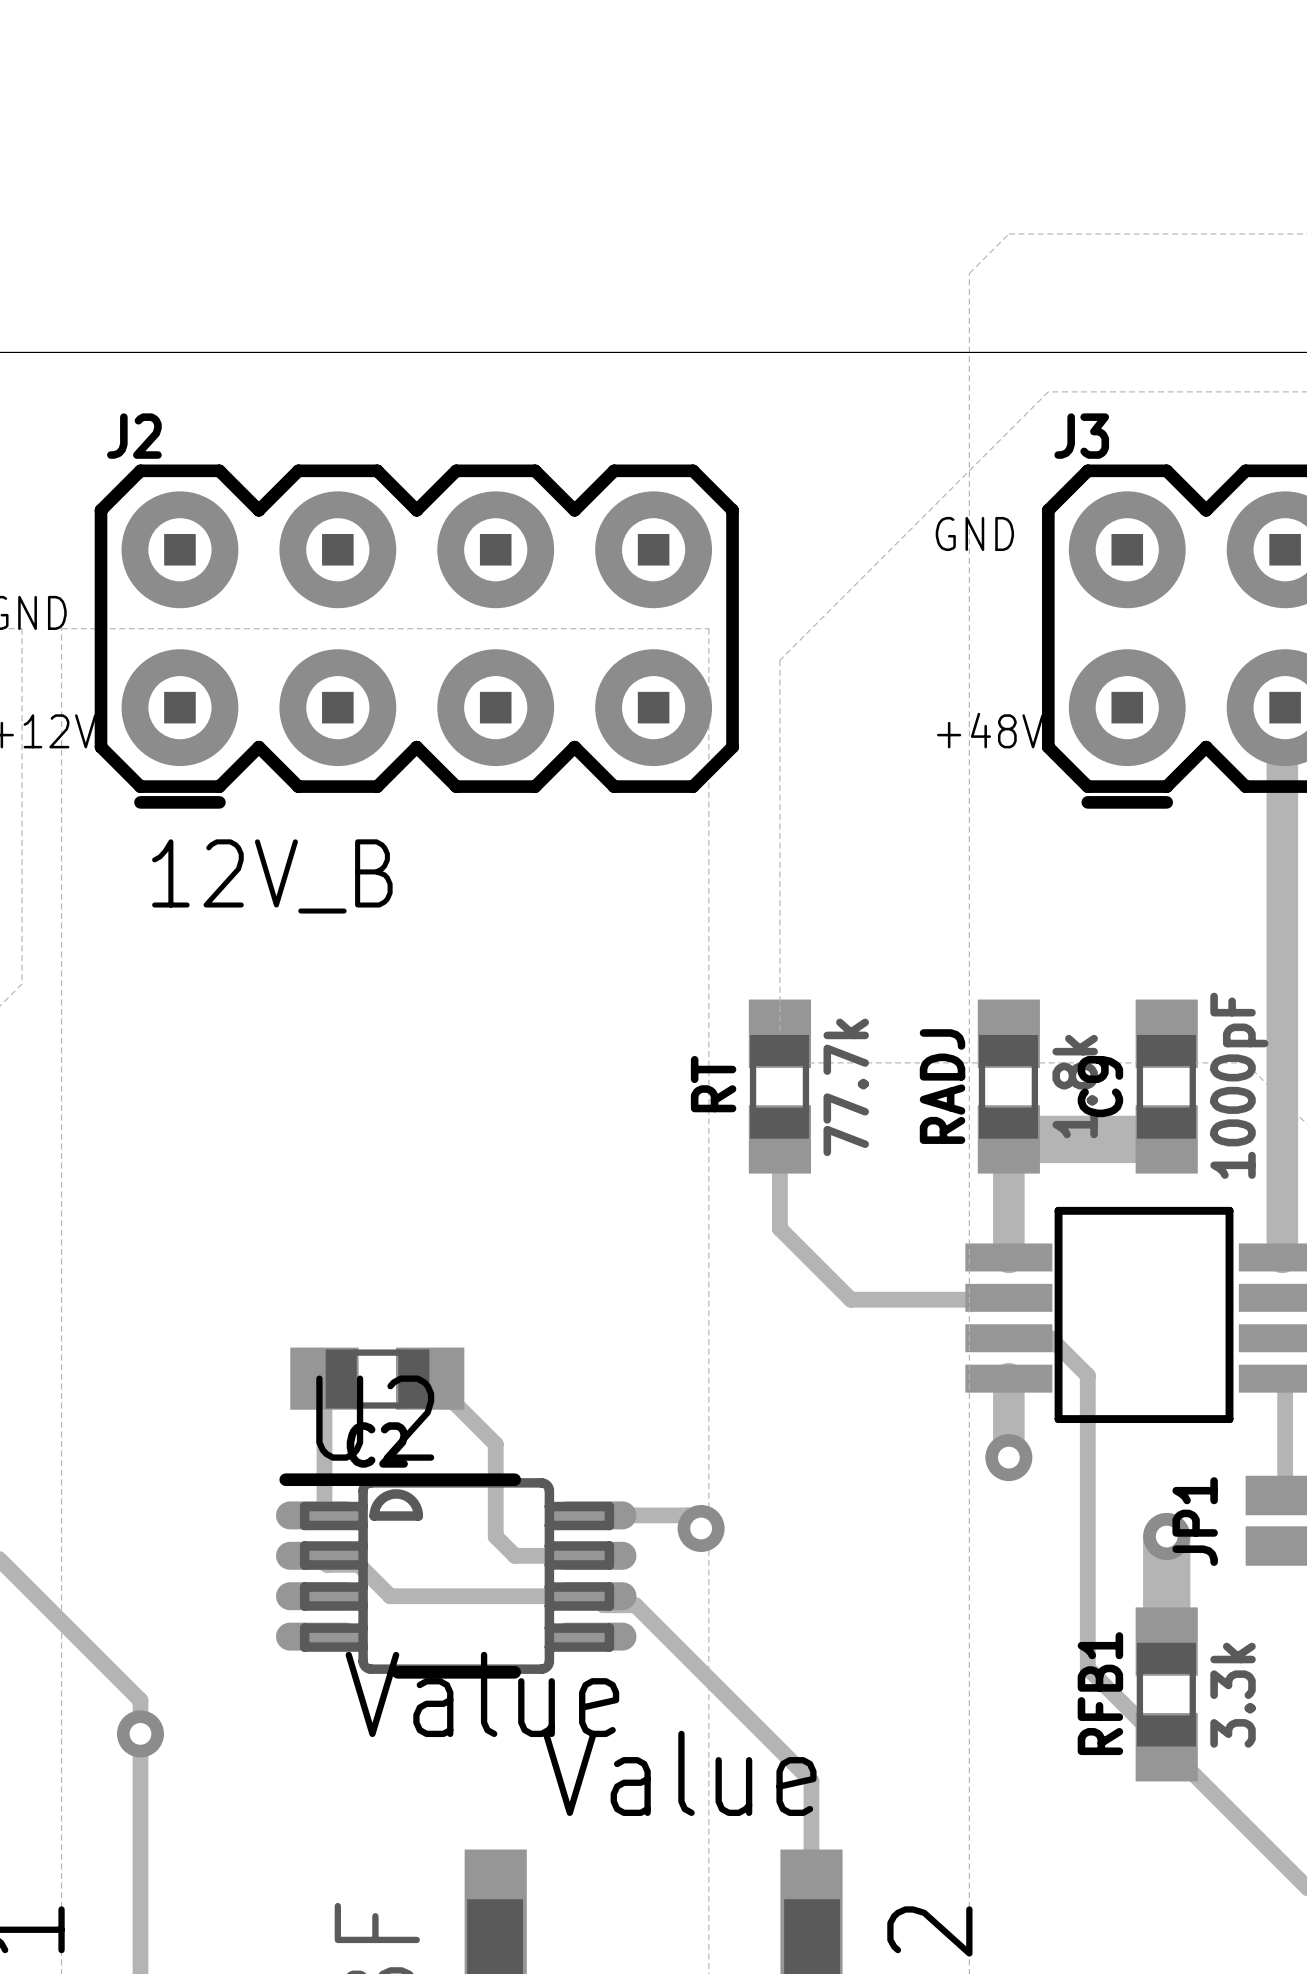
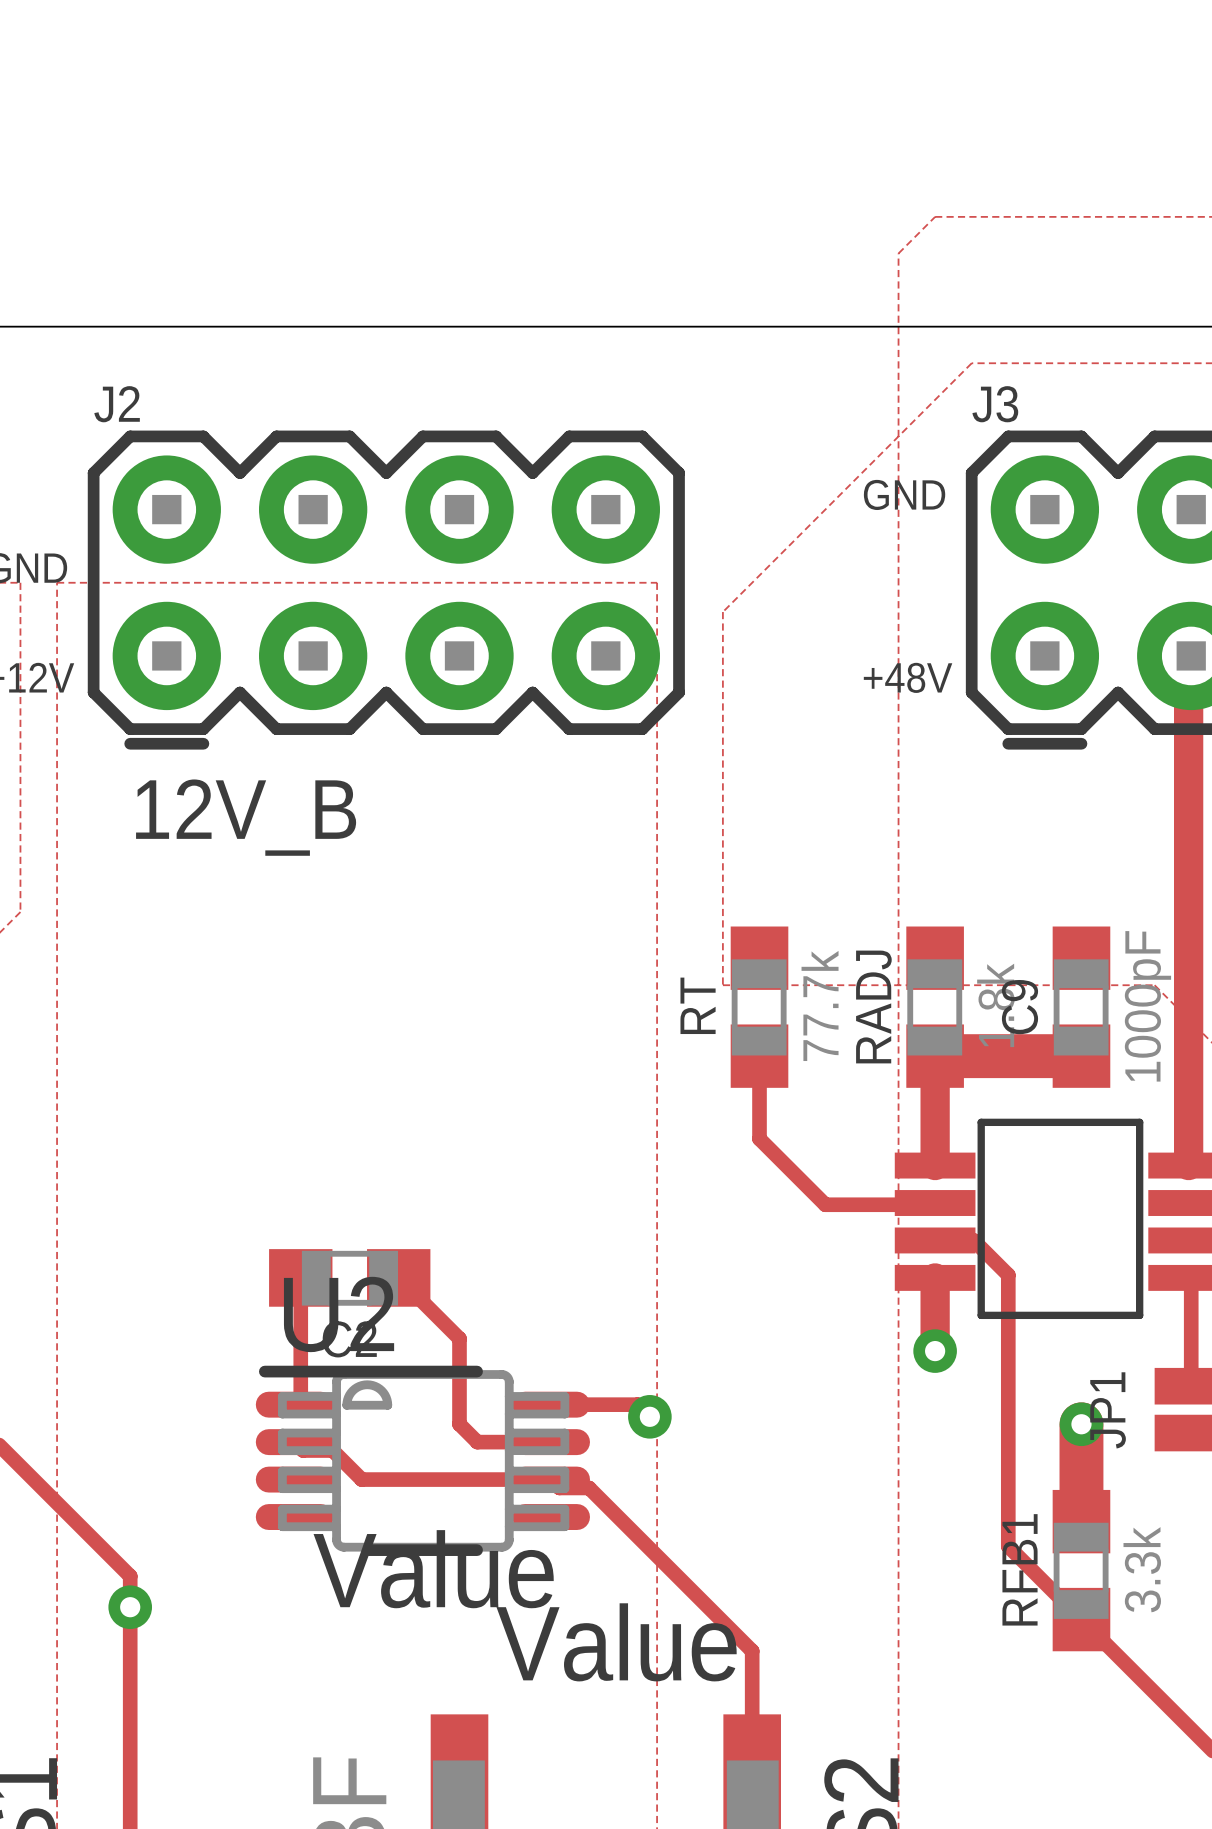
RT position: (779, 1086) -> (759, 1007)
track: (779, 1139) (779, 1228) (850, 1299) (890, 1299) -> (759, 1056) (759, 1138) (825, 1204)

